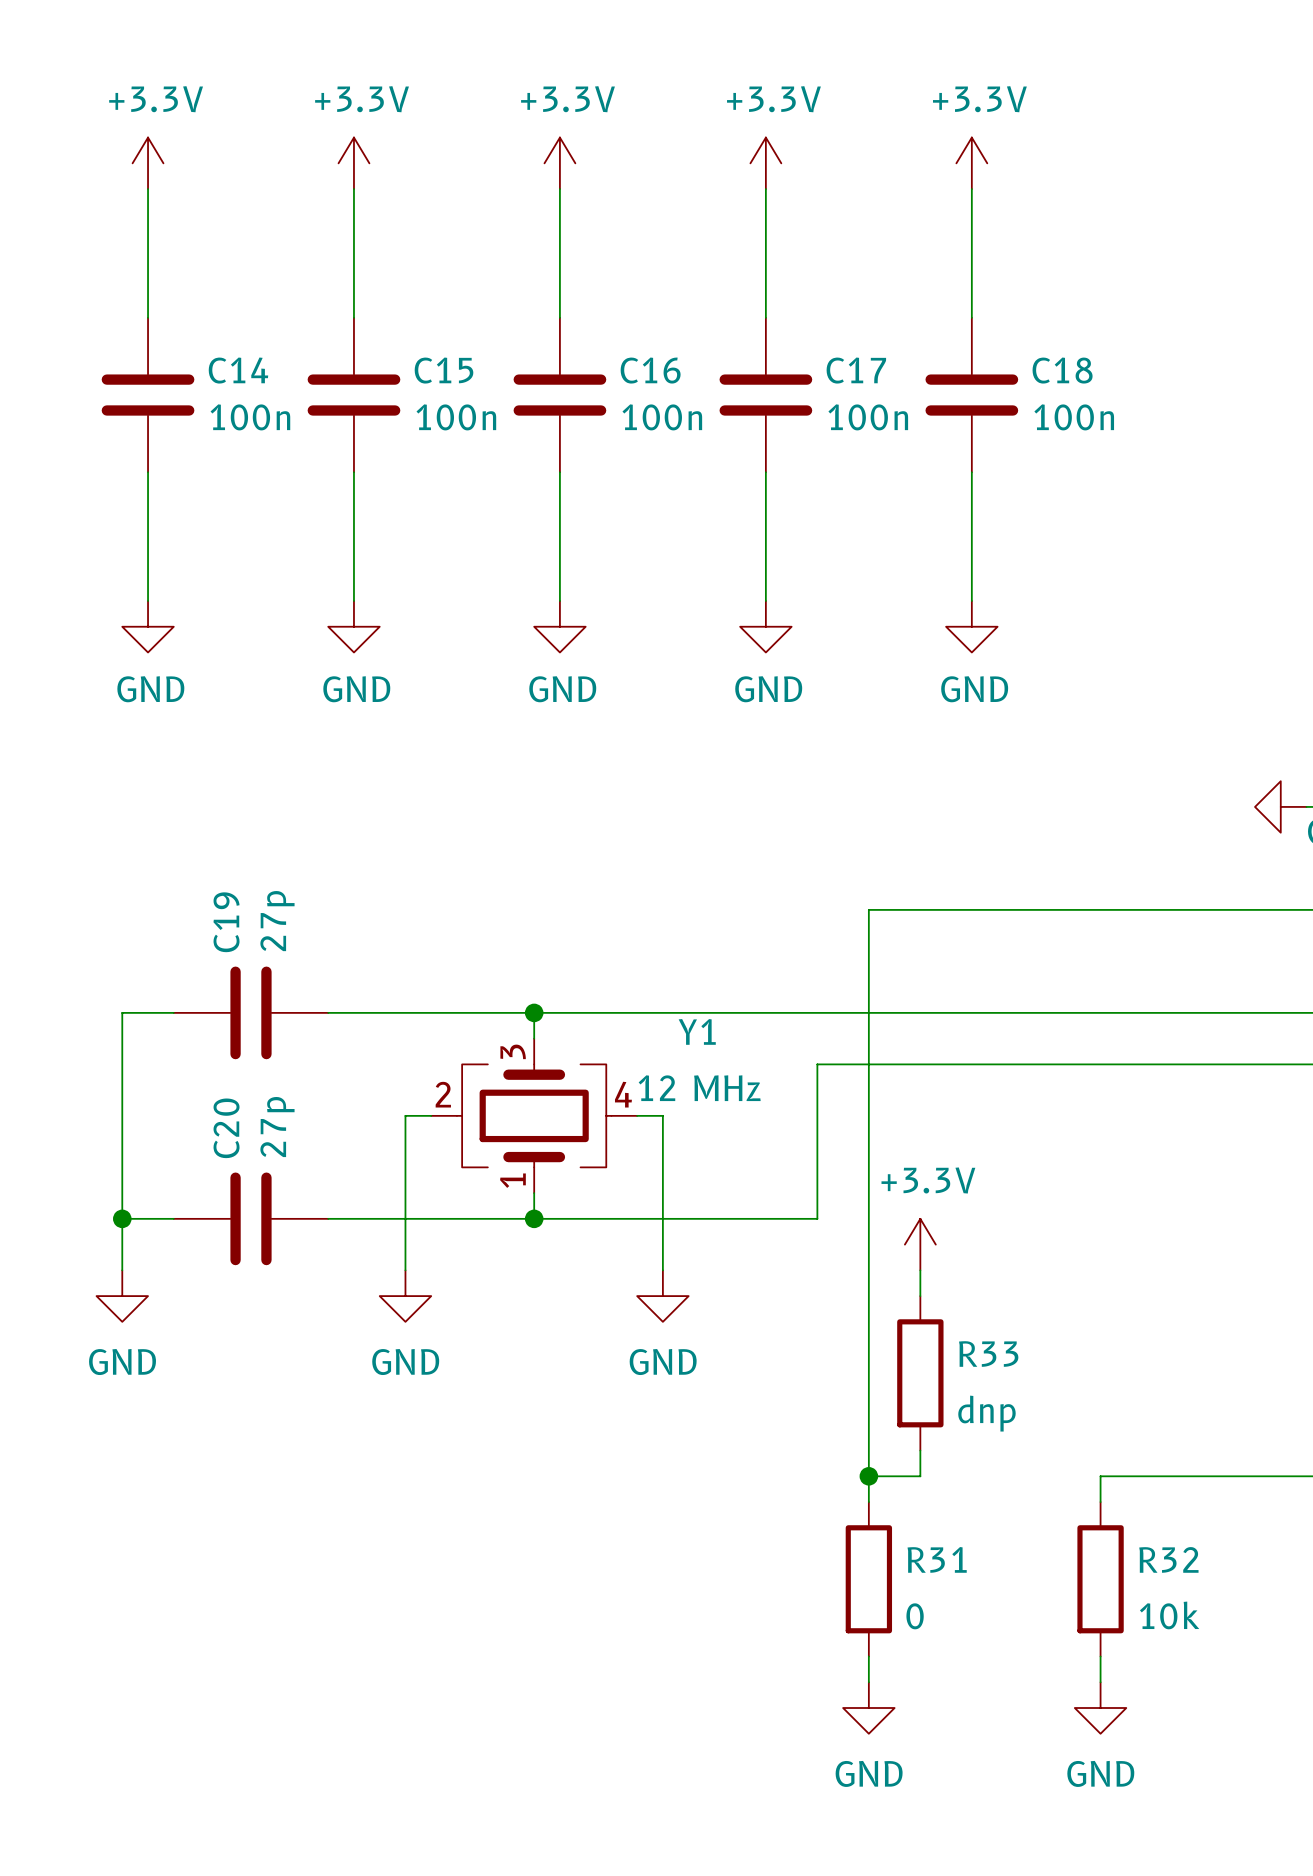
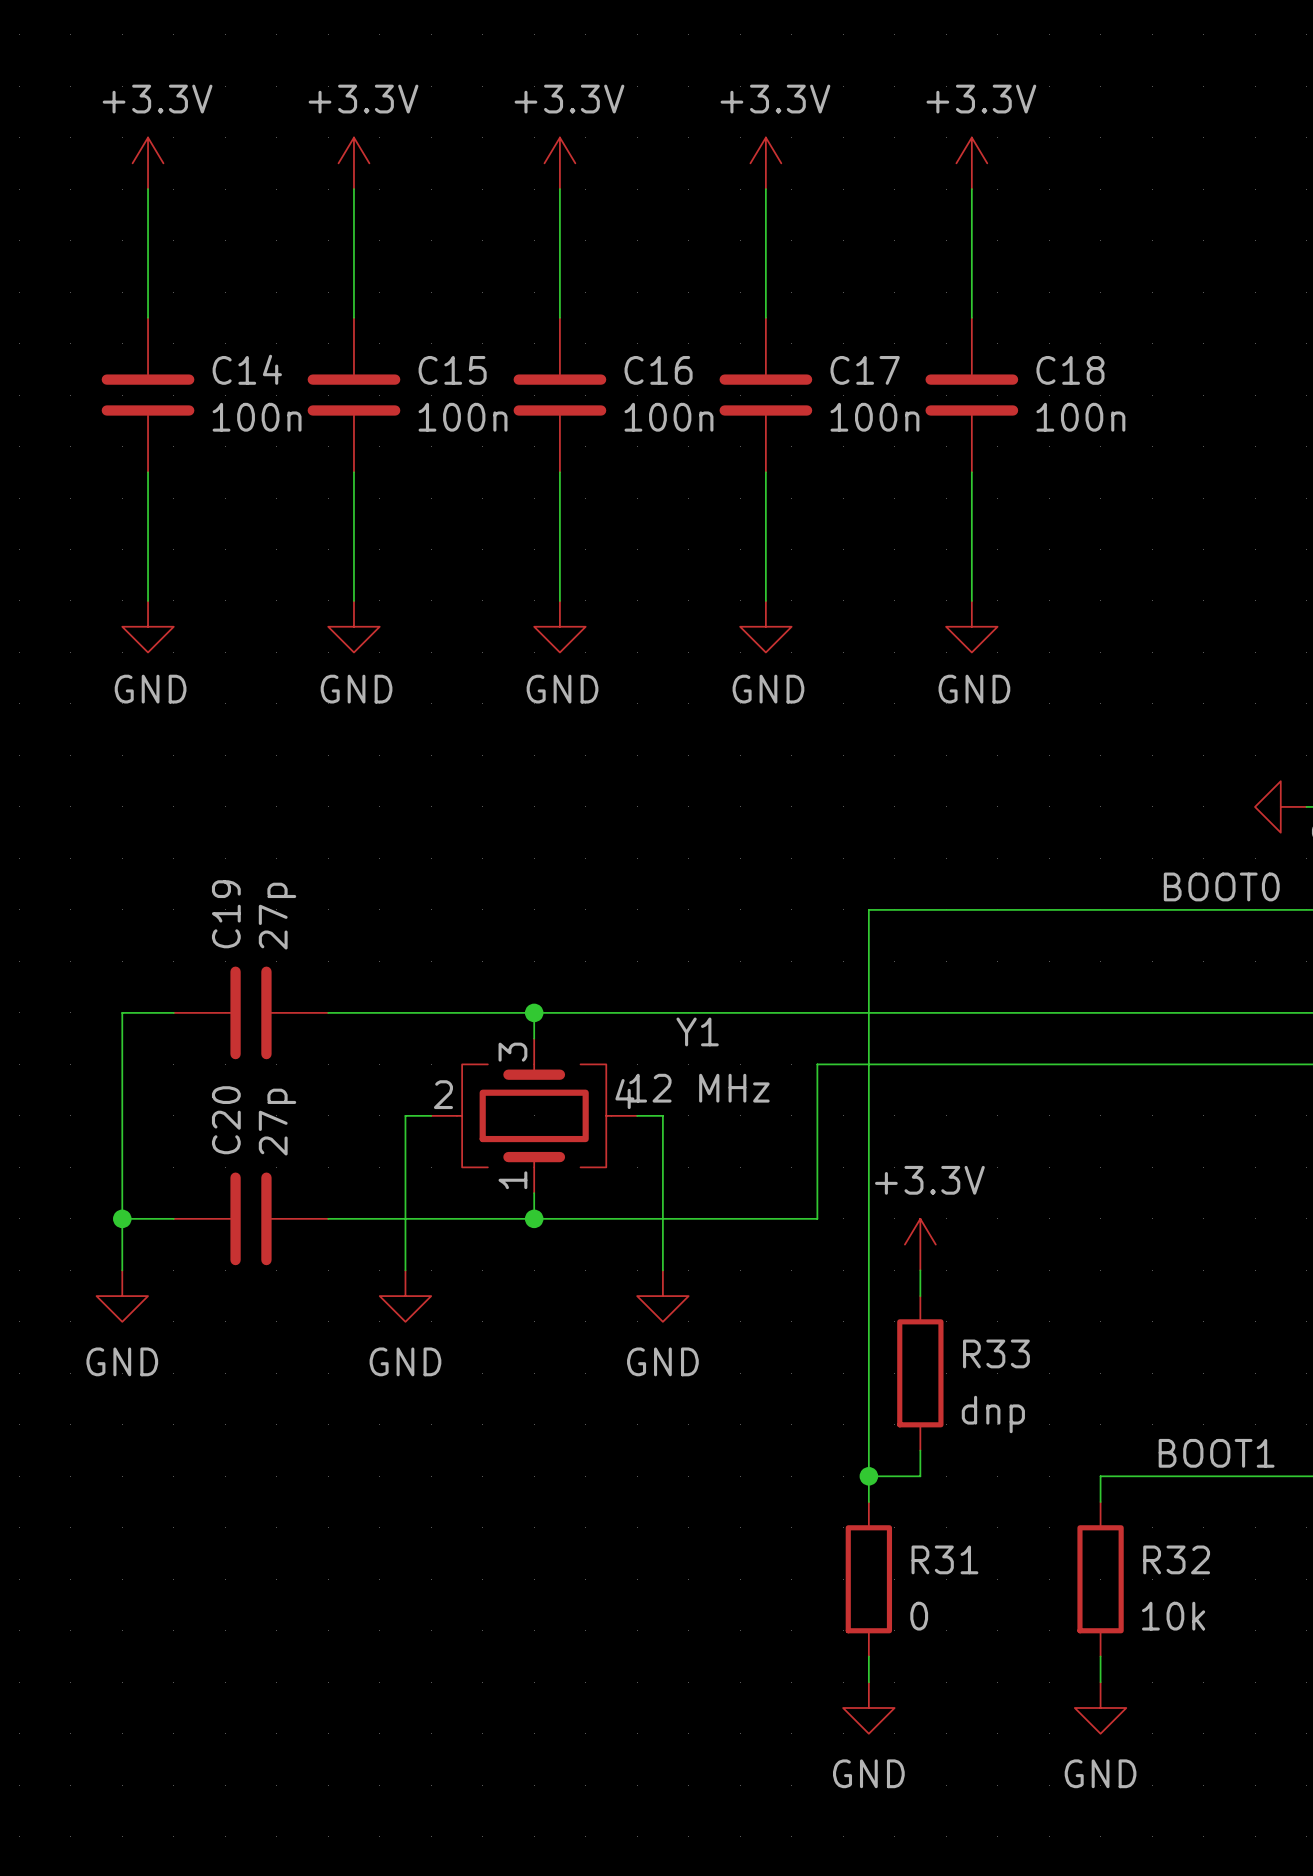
label: none -> BOOT0 (1221, 886)
label: none -> BOOT1 (1216, 1453)

